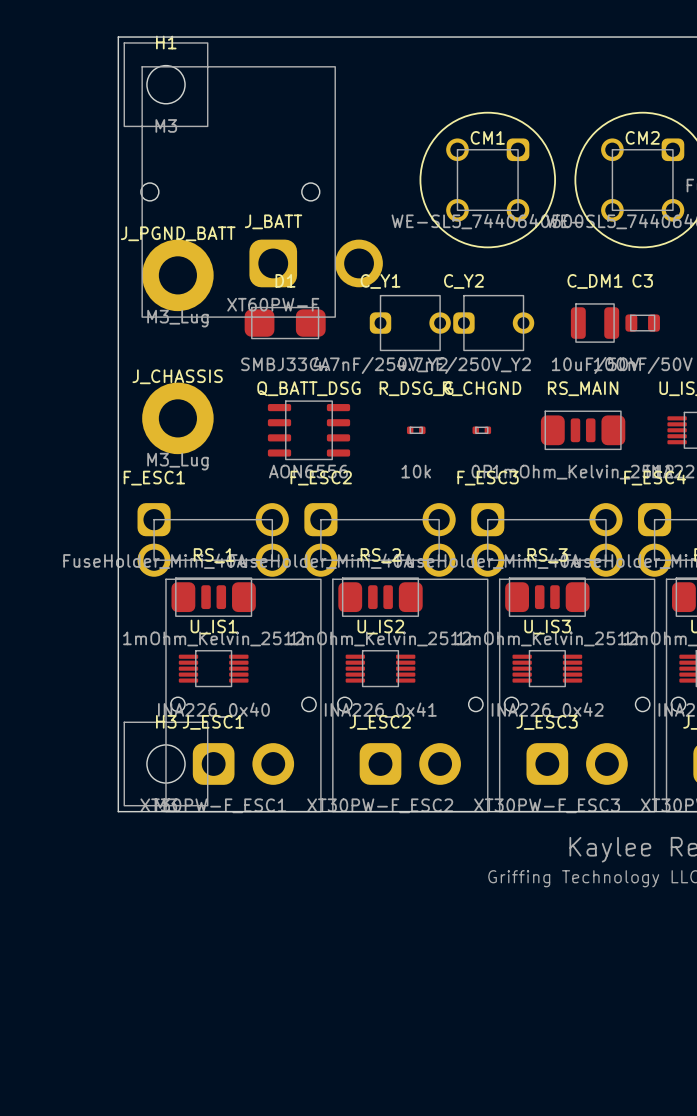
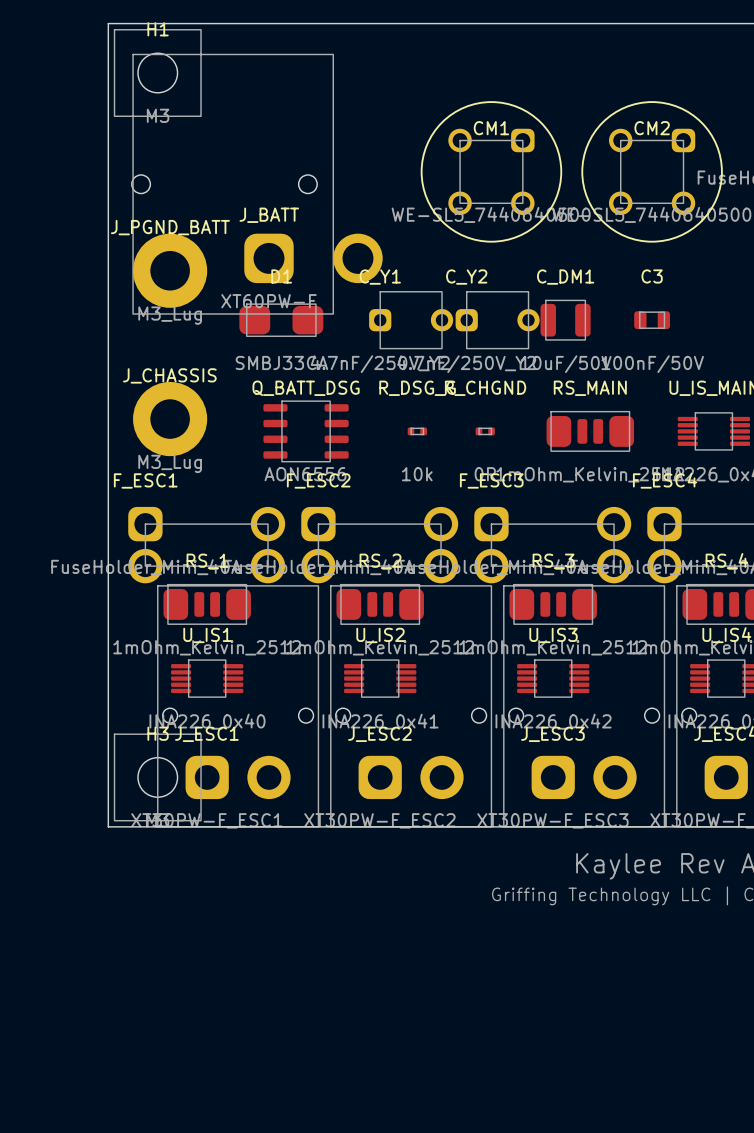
C_DM1 position: (595, 323) -> (565, 320)

